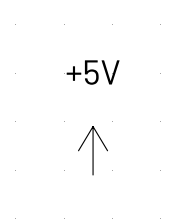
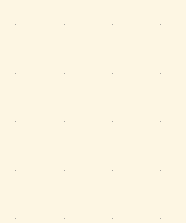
power symbol: +5V (93, 150) -> none

